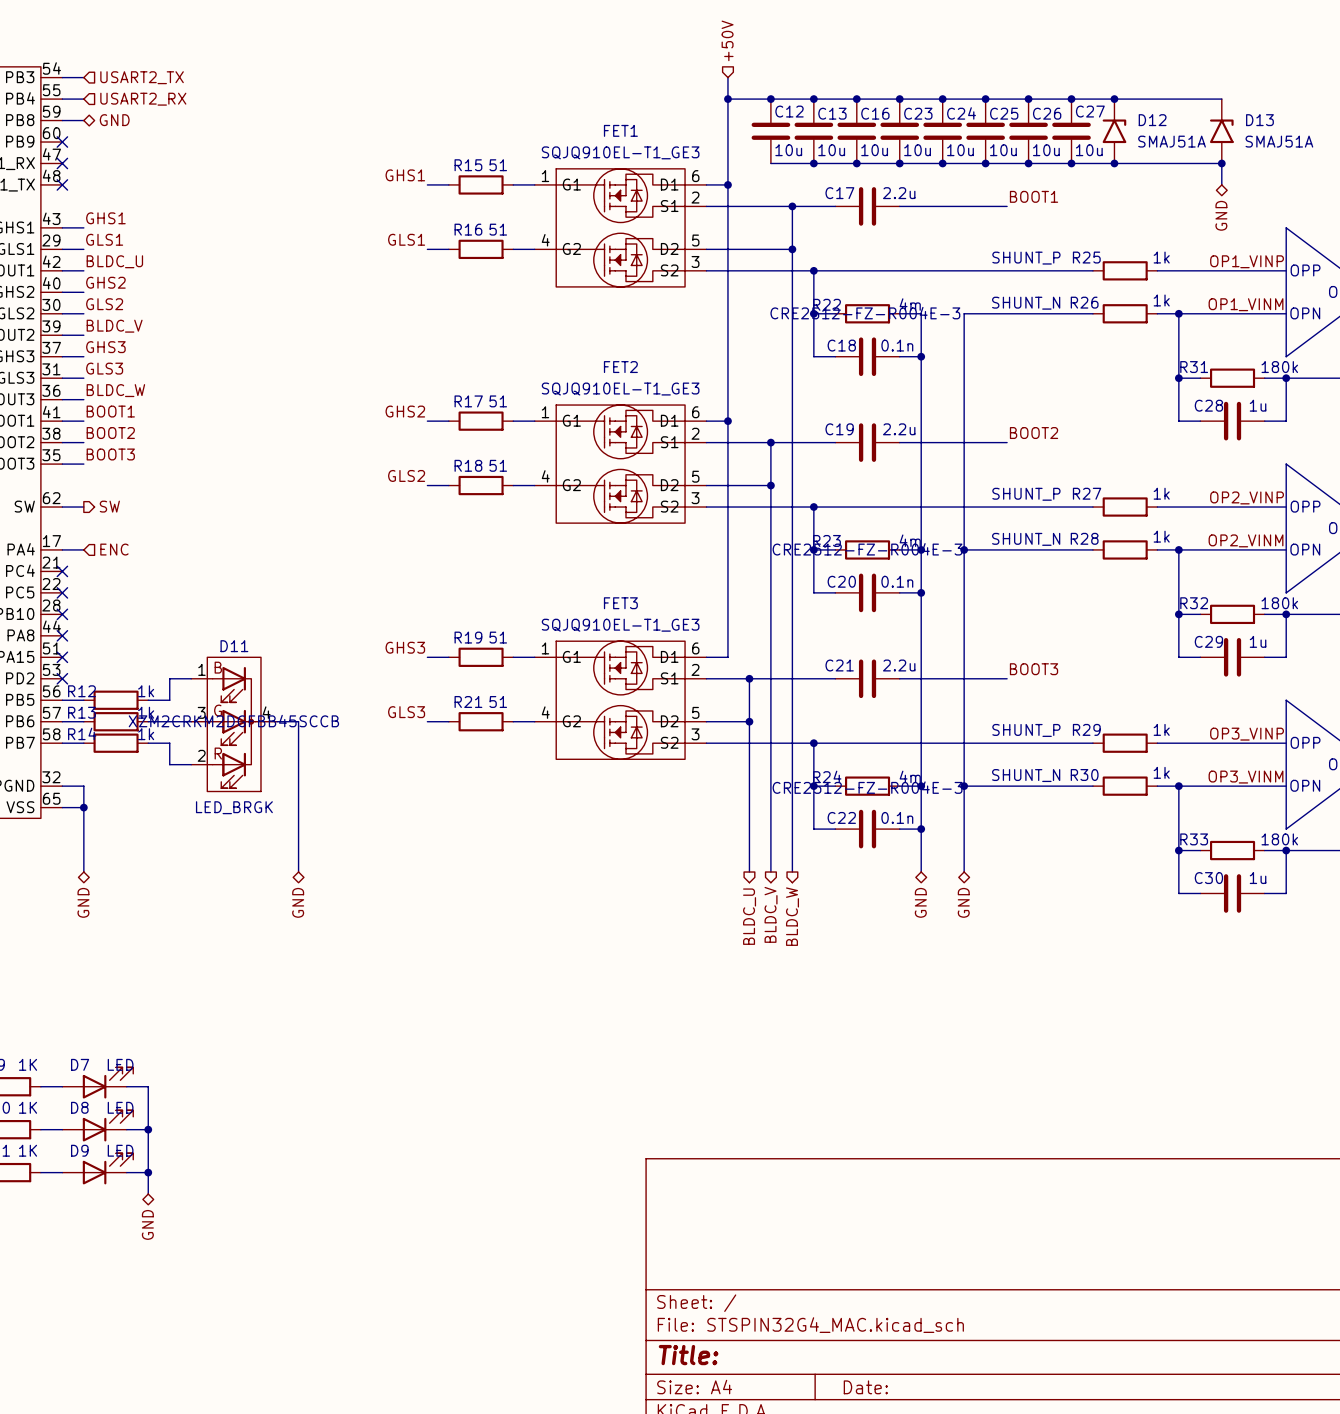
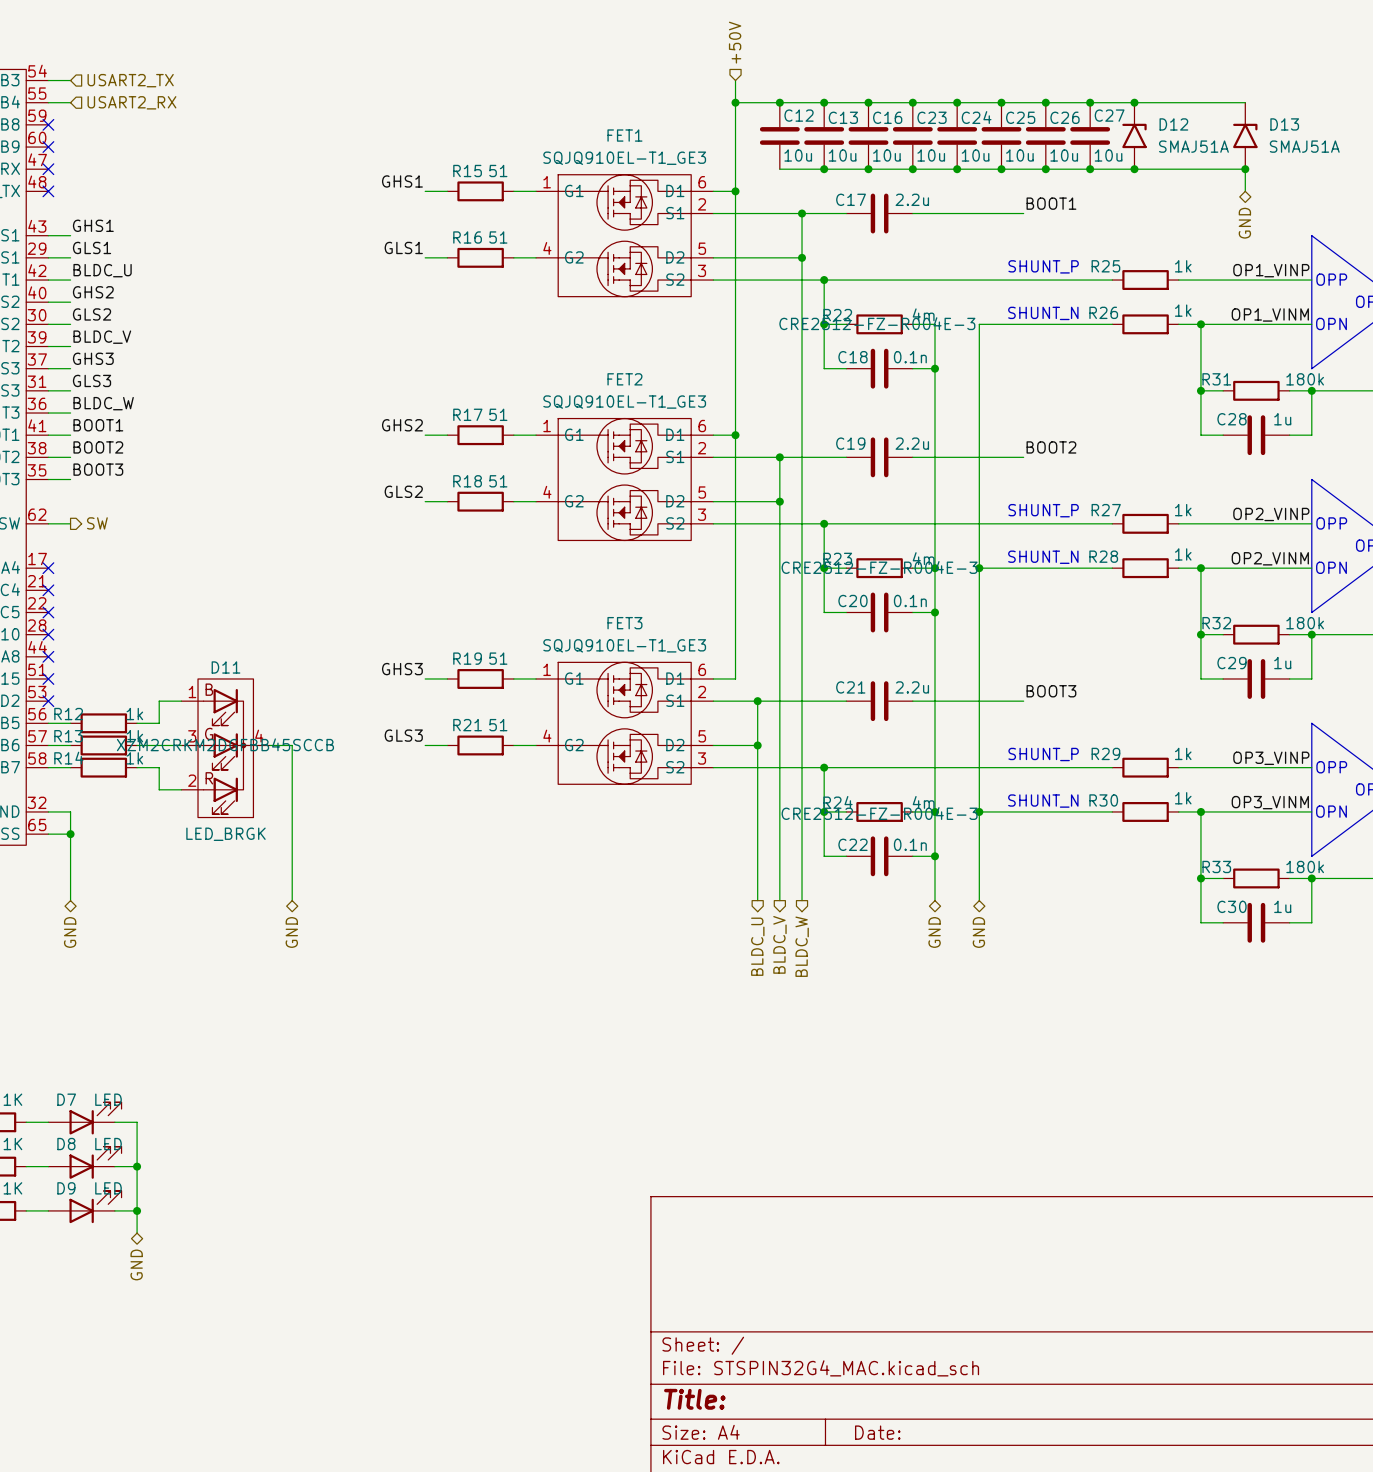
wire: (62, 120) (83, 120) -> none
no-connect mark: none -> (48, 124)
hierarchical label: GND (114, 120) -> none
wire: (62, 549) (83, 549) -> none
no-connect mark: none -> (48, 568)
hierarchical label: ENC (114, 549) -> none

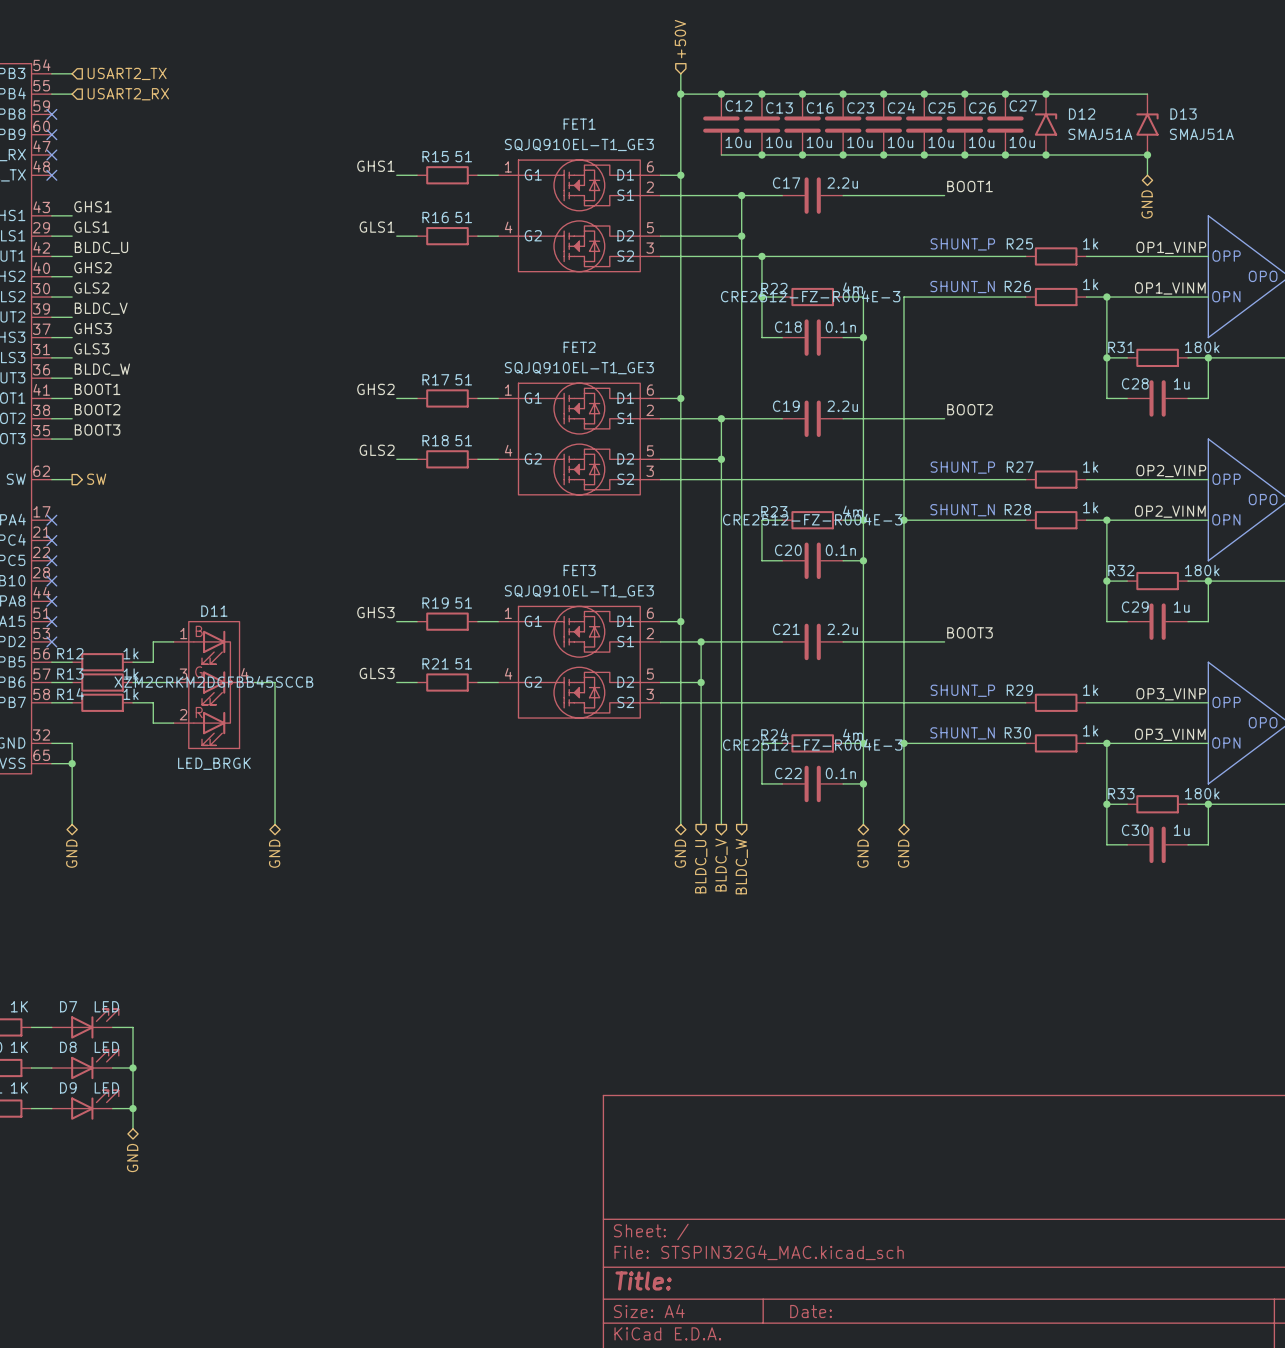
wire: (824, 523) (824, 568) -> none
junction: (824, 523) -> none
junction: (824, 568) -> none
wire: none -> (680, 621) (680, 824)
junction: none -> (680, 621)
wire: (824, 767) (824, 811) -> none
junction: (824, 767) -> none
junction: (824, 811) -> none
hierarchical label: none -> GND (680, 853)

